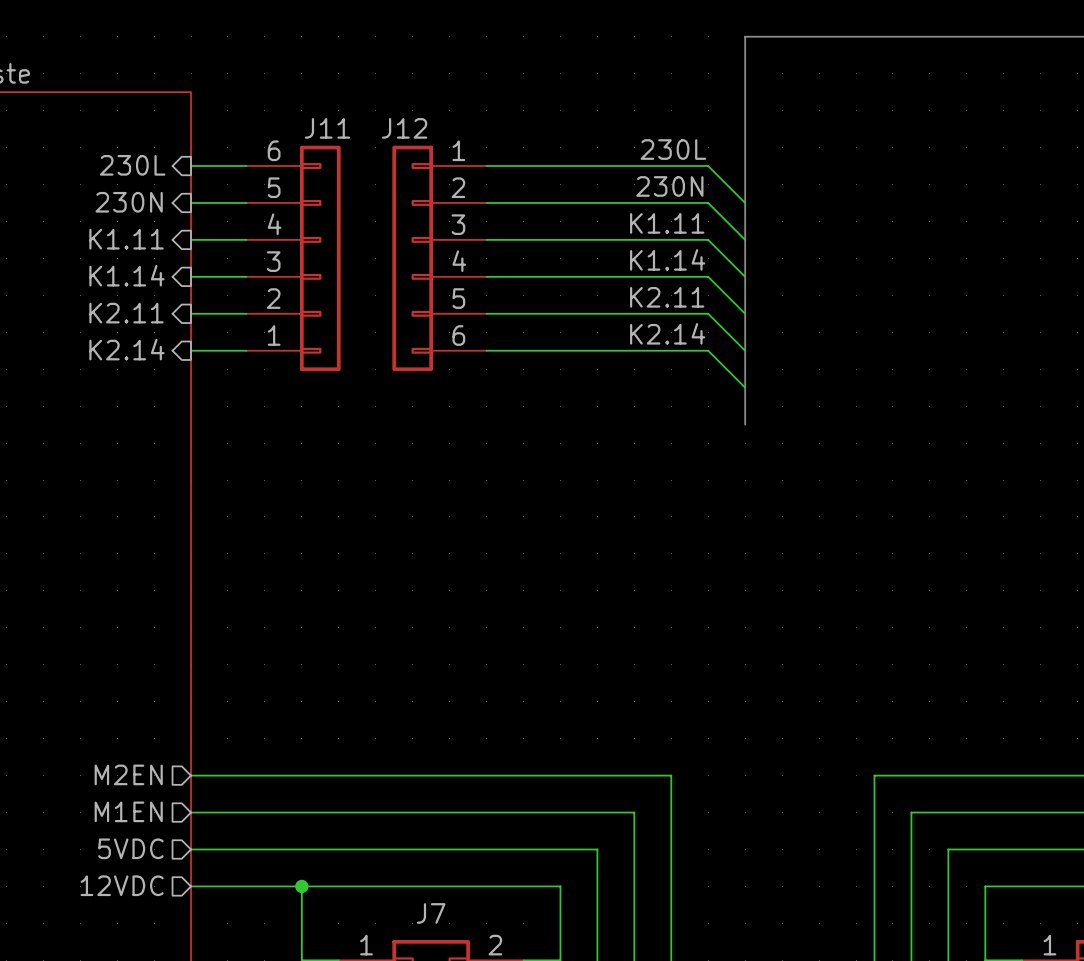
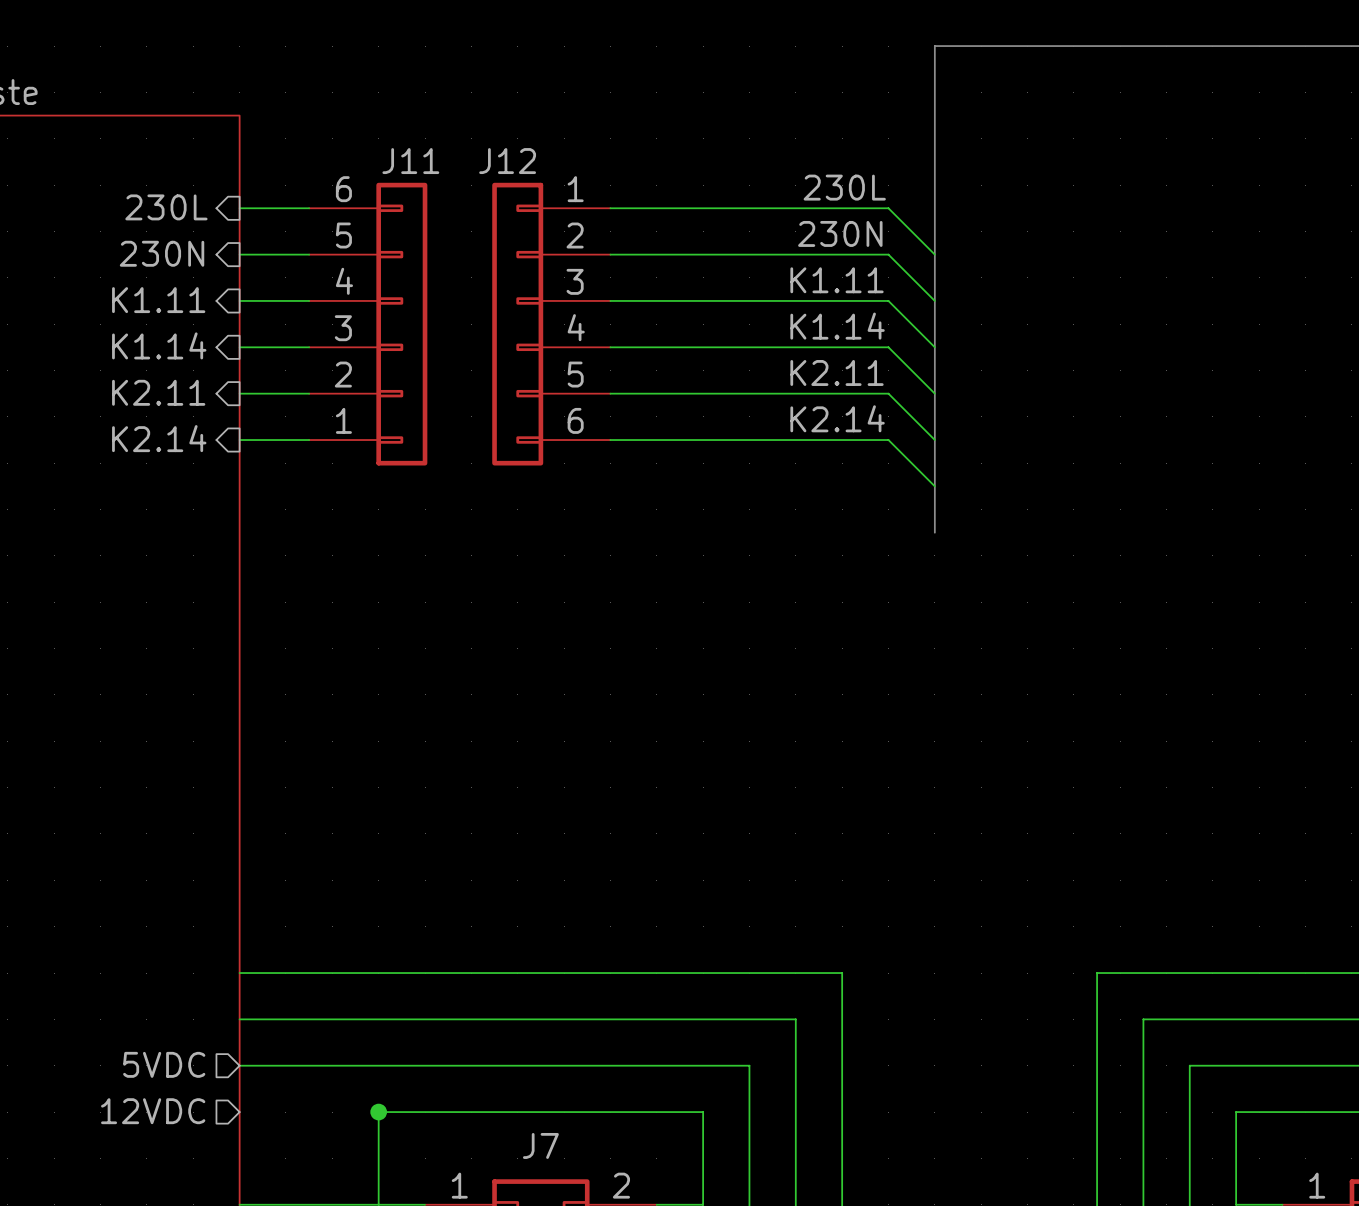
sheet pin: M2EN (128, 774) -> none
sheet pin: M1EN (128, 811) -> none
wire: (191, 886) (301, 886) -> (239, 1204) (378, 1204)

